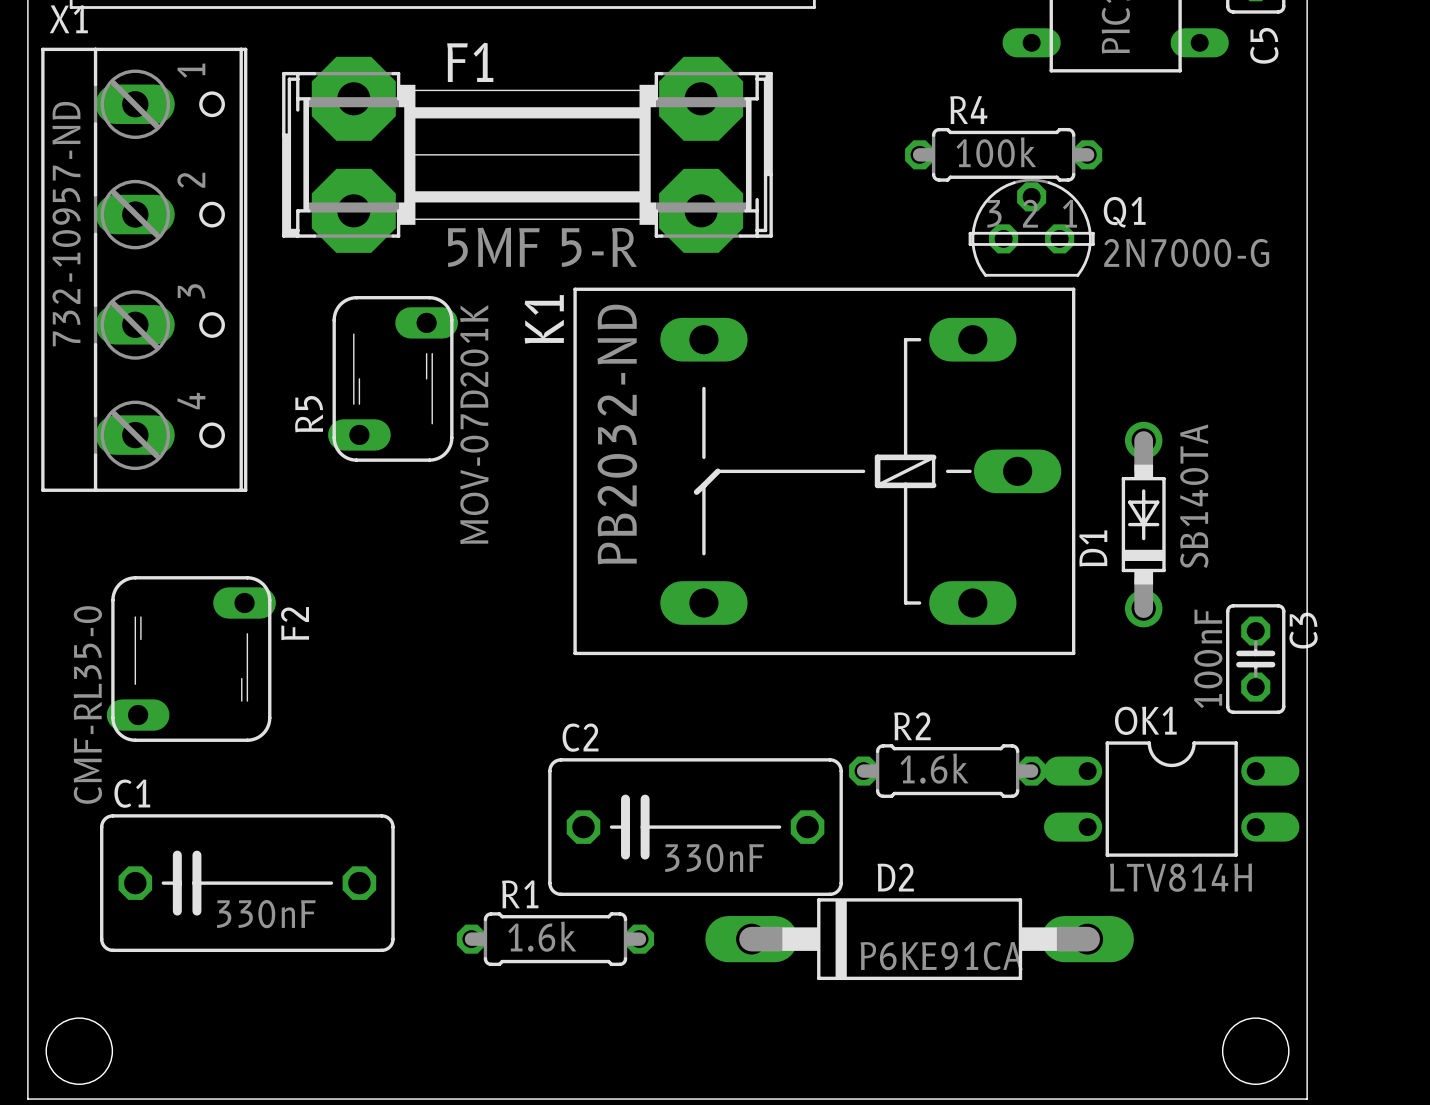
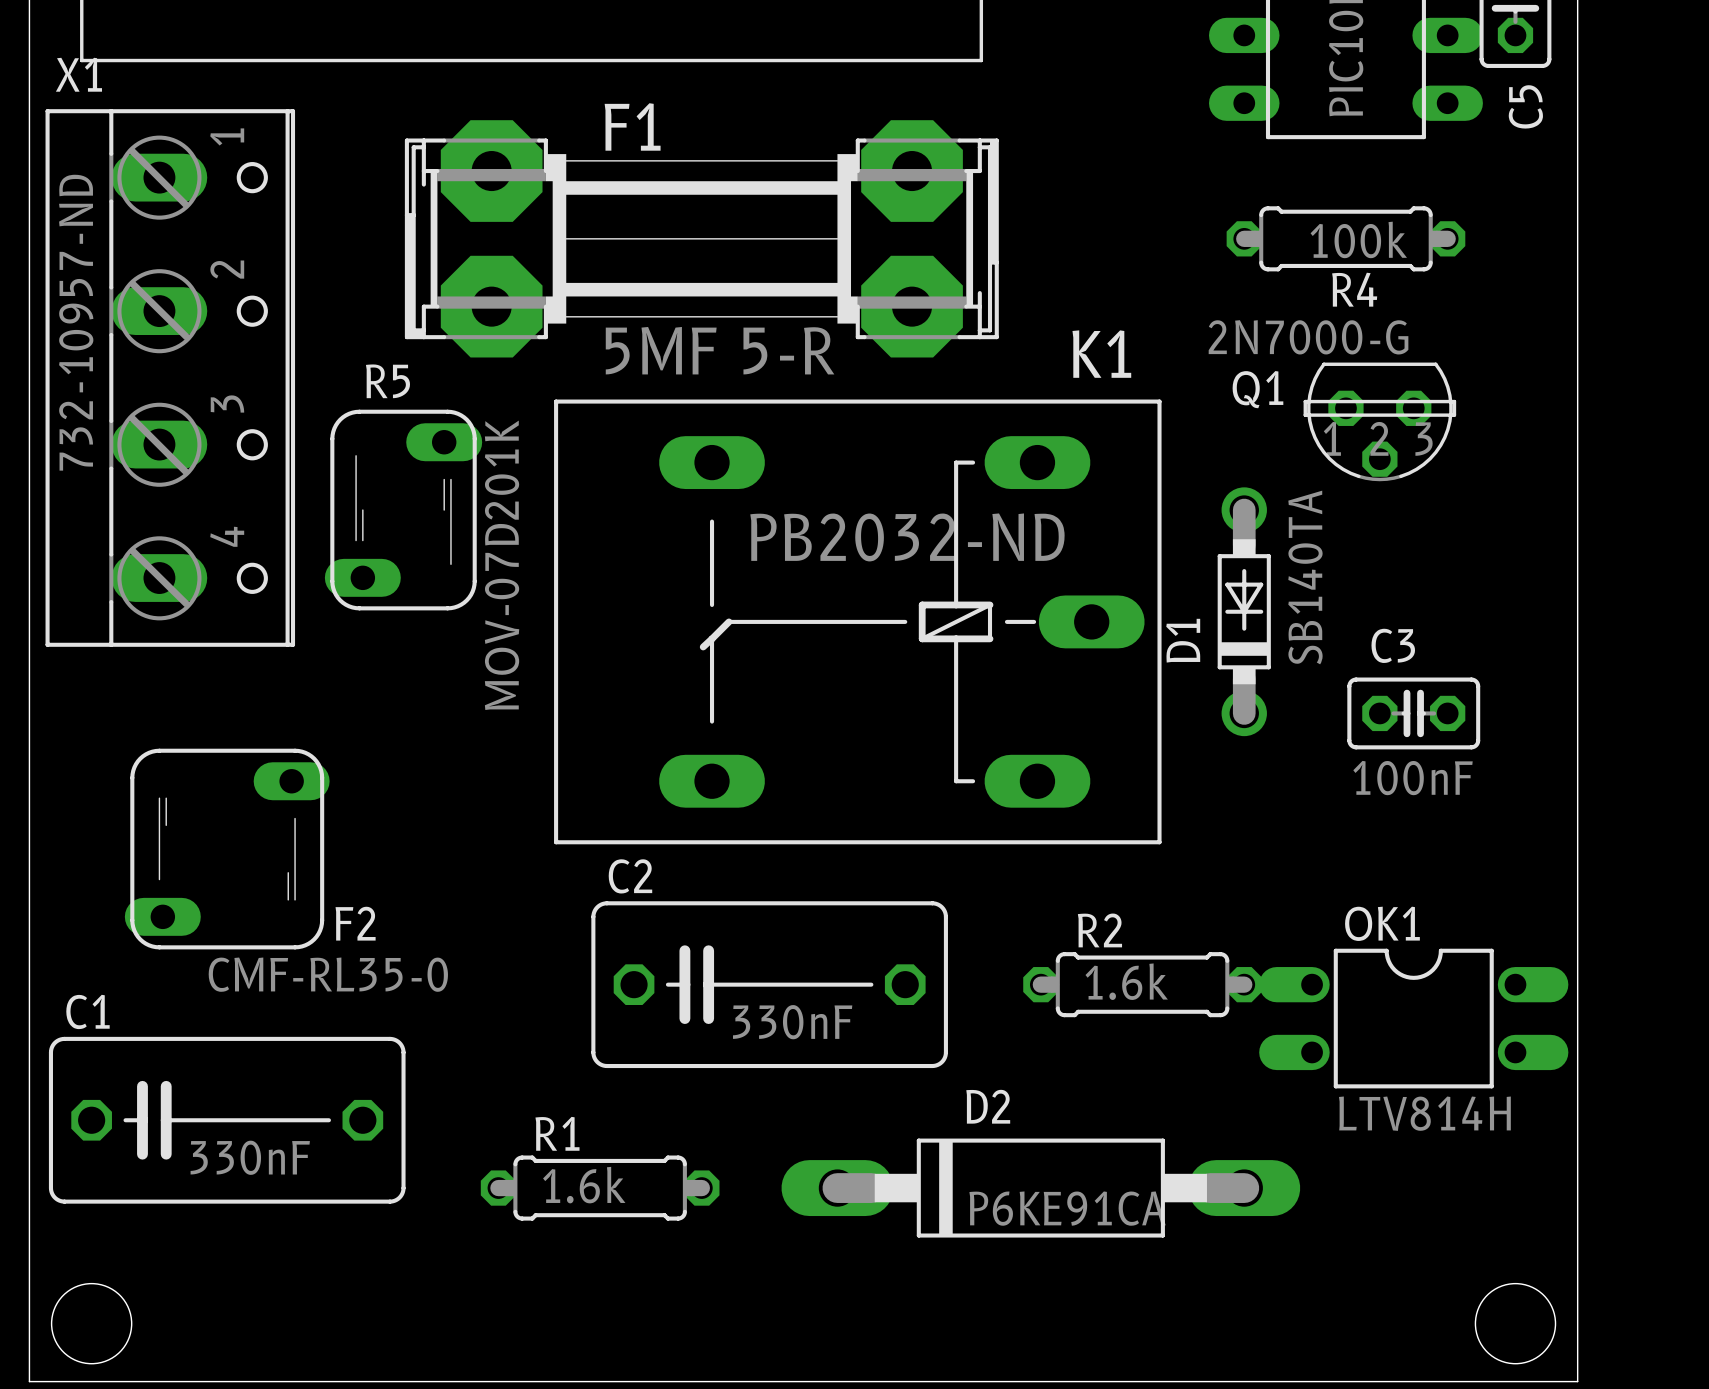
R4 name position: R4 (968, 110) -> R4 (1354, 289)
R4 value position: 100k (996, 152) -> 100k (1358, 239)
F1 position: (527, 154) -> (701, 238)
R4 position: (1003, 154) -> (1345, 238)
Q1 footprint: [968, 178, 1095, 277] -> [1303, 362, 1457, 482]
Q1 name position: Q1 (1124, 212) -> Q1 (1257, 389)
Q1 value position: 2N7000-G (1186, 253) -> 2N7000-G (1308, 337)
K1 name rotation: 0° (544, 319) -> 90° clockwise (1101, 354)
K1 name position: K1 (544, 319) -> K1 (1101, 354)
R5 position: (393, 378) -> (403, 510)
R5 name rotation: 0° (309, 414) -> 90° clockwise (387, 381)
R5 name position: R5 (309, 414) -> R5 (387, 381)
K1 value rotation: 0° (617, 434) -> 90° clockwise (907, 537)
K1 position: (824, 471) -> (857, 621)
D1 position: (1143, 524) -> (1244, 611)
F2 name rotation: 0° (295, 623) -> 90° clockwise (355, 923)
F2 name position: F2 (295, 623) -> F2 (355, 923)
C3 name position: C3 (1303, 630) -> C3 (1393, 645)
C3 value position: 100nF (1208, 658) -> 100nF (1413, 778)
C3 rotation: 0° (1255, 659) -> 90° clockwise (1413, 713)
C3 position: (1255, 659) -> (1413, 713)
F2 value rotation: 0° (87, 705) -> 90° clockwise (328, 974)
C2 position: (695, 827) -> (769, 984)
D2 name position: D2 (895, 877) -> D2 (988, 1106)
C1 position: (247, 883) -> (227, 1120)
R1 position: (555, 939) -> (600, 1188)
D2 position: (919, 939) -> (1040, 1188)

